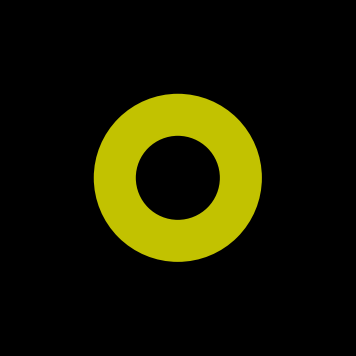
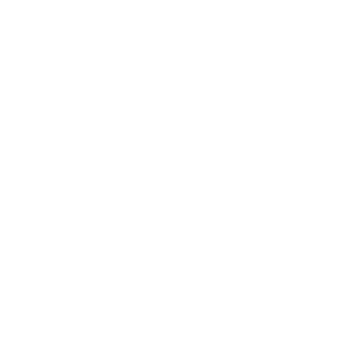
part: (177, 177) -> none

